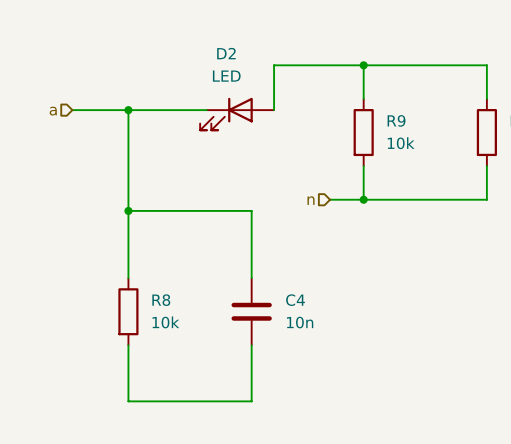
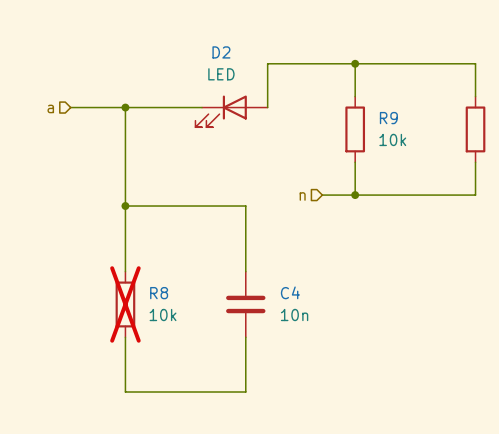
R8 do-not-place cross: none -> (125, 304)

